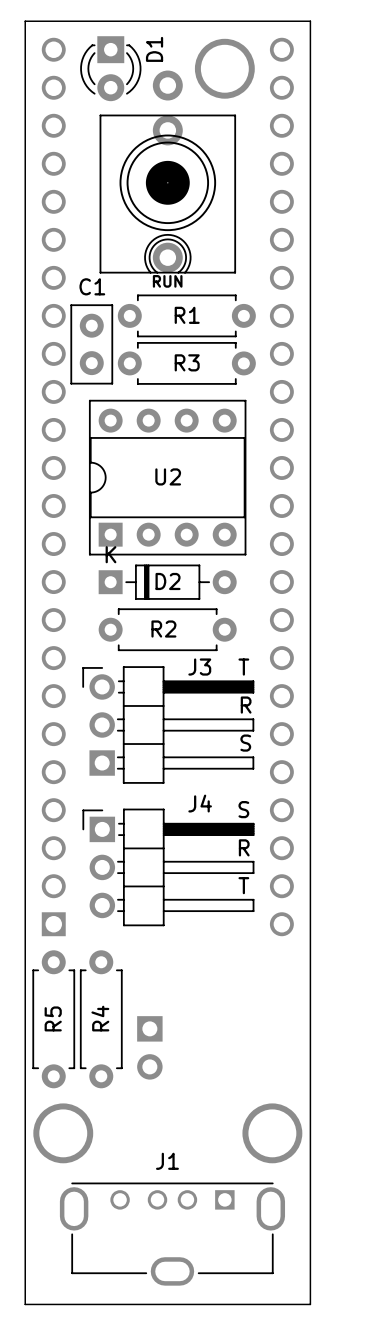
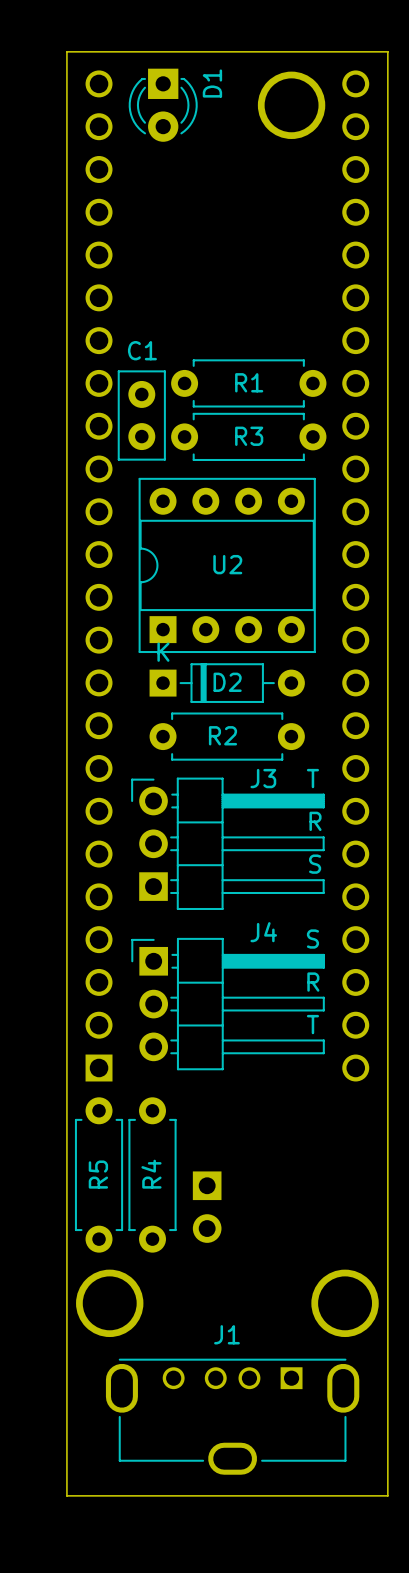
part: RUN (167, 172) -> none

